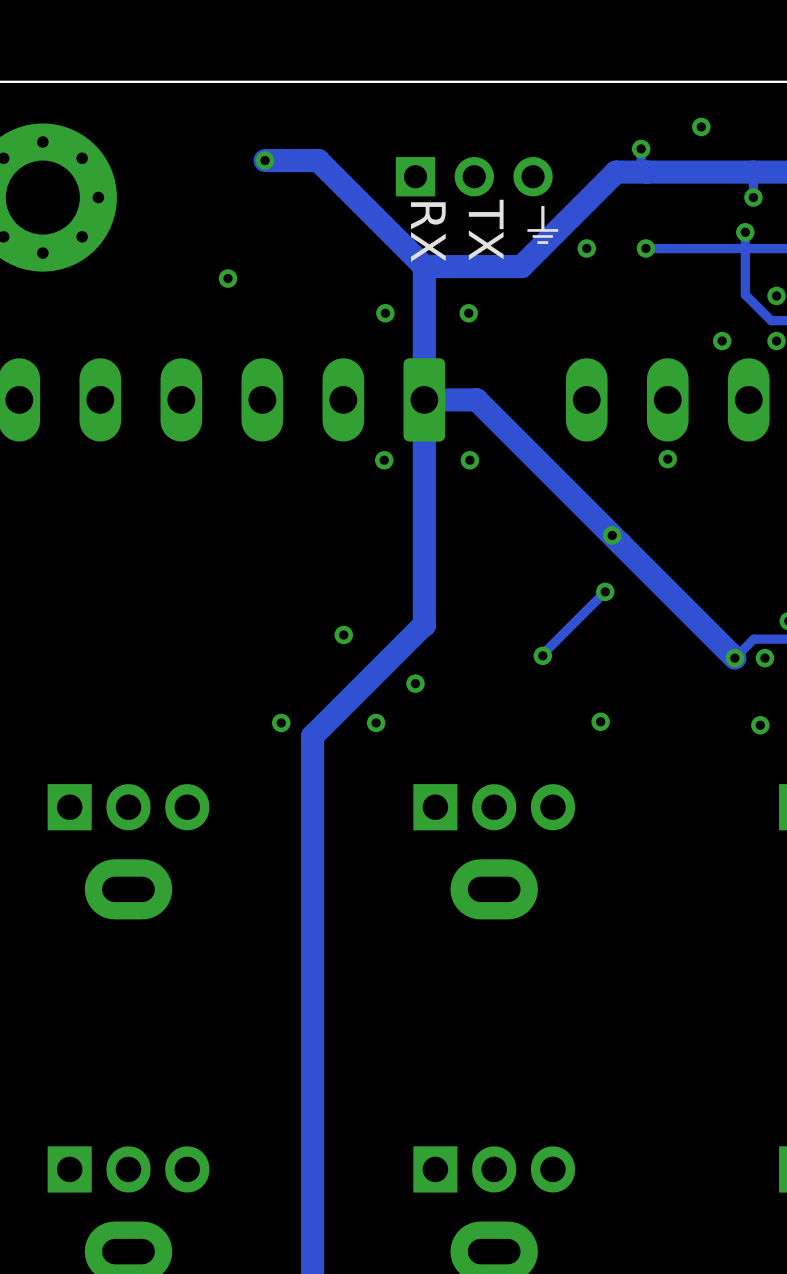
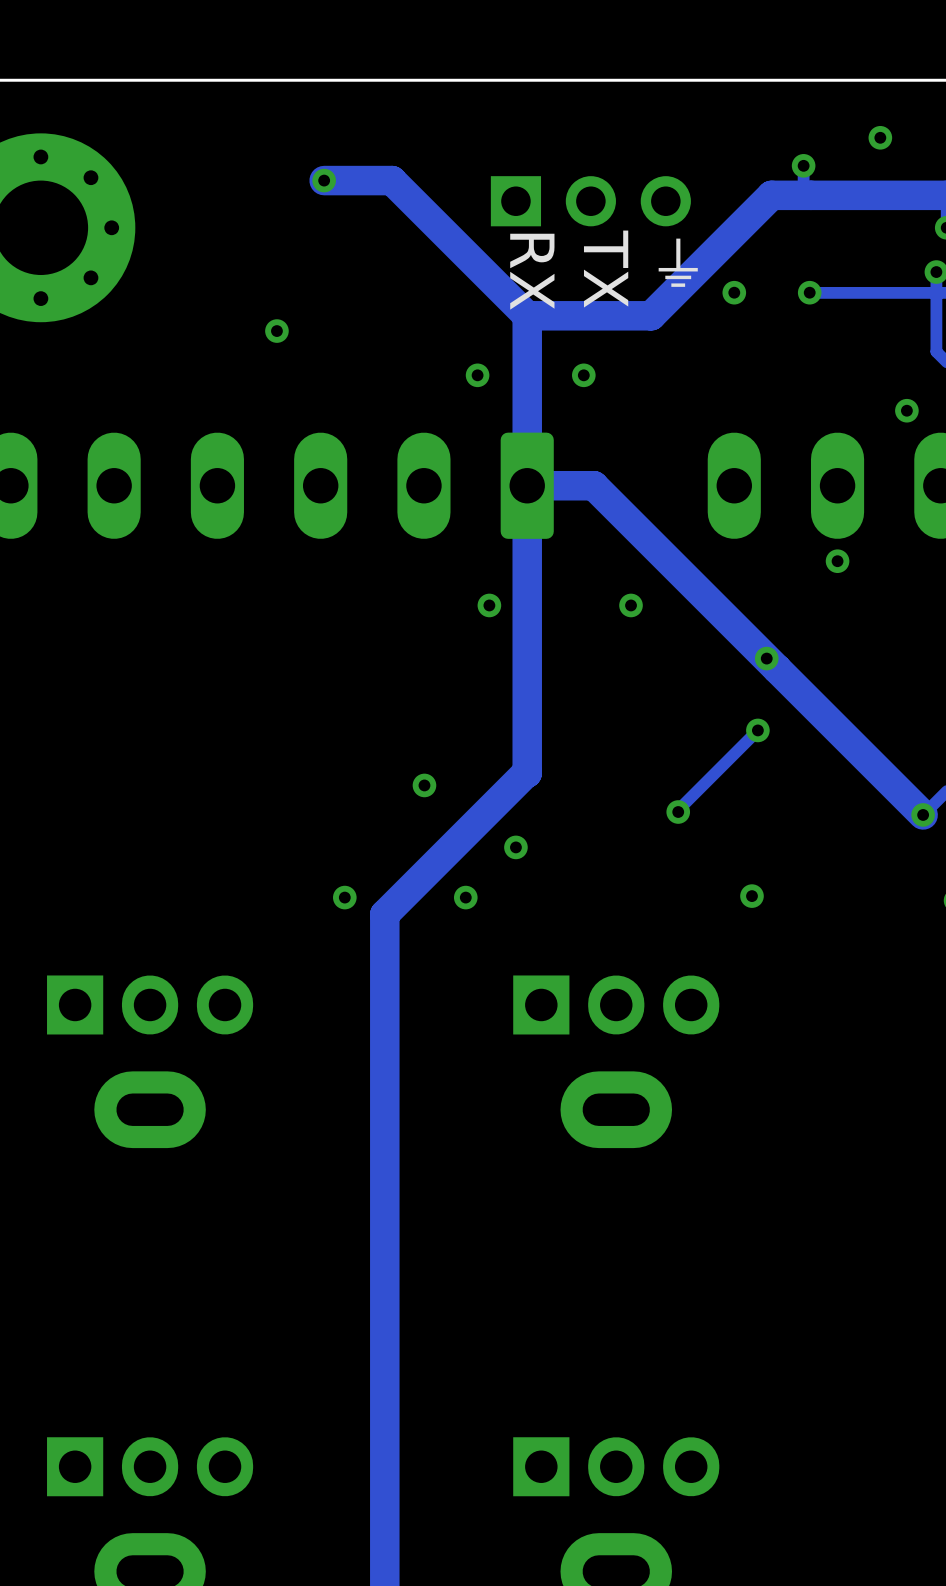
via position: (384, 460) -> (489, 605)
via: (469, 460) -> none
via: none -> (631, 605)

